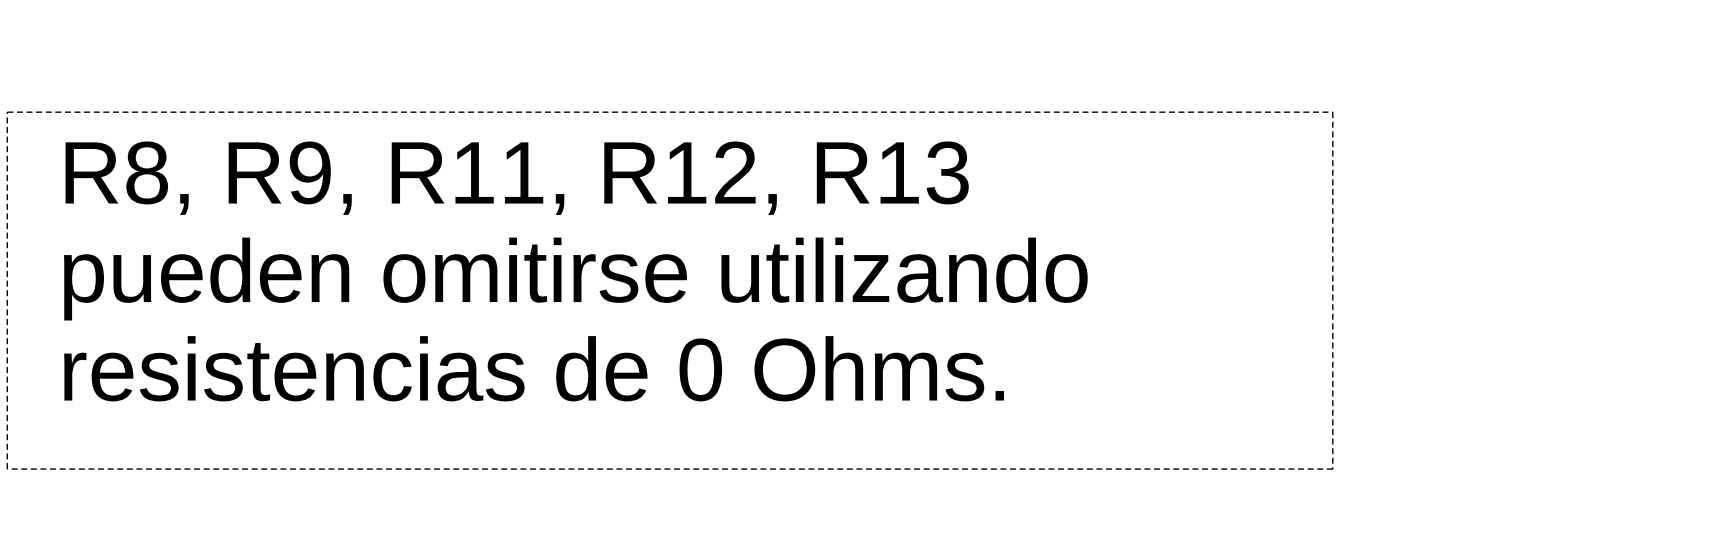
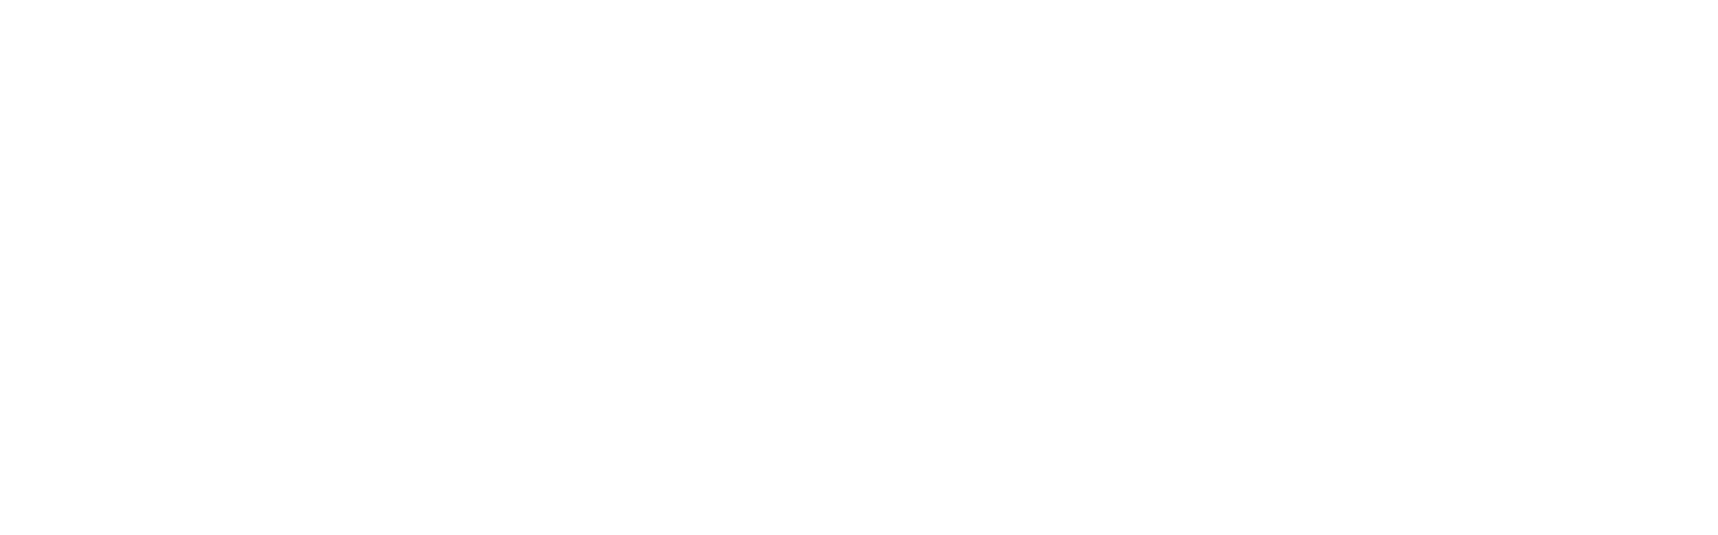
line: (7, 112) (1332, 112) (1332, 469) (7, 469) (7, 112) -> none
text: R8, R9, R11, R12, R13 (517, 178) -> none
text: pueden omitirse utilizando (575, 279) -> none
text: resistencias de 0 Ohms. (534, 368) -> none

